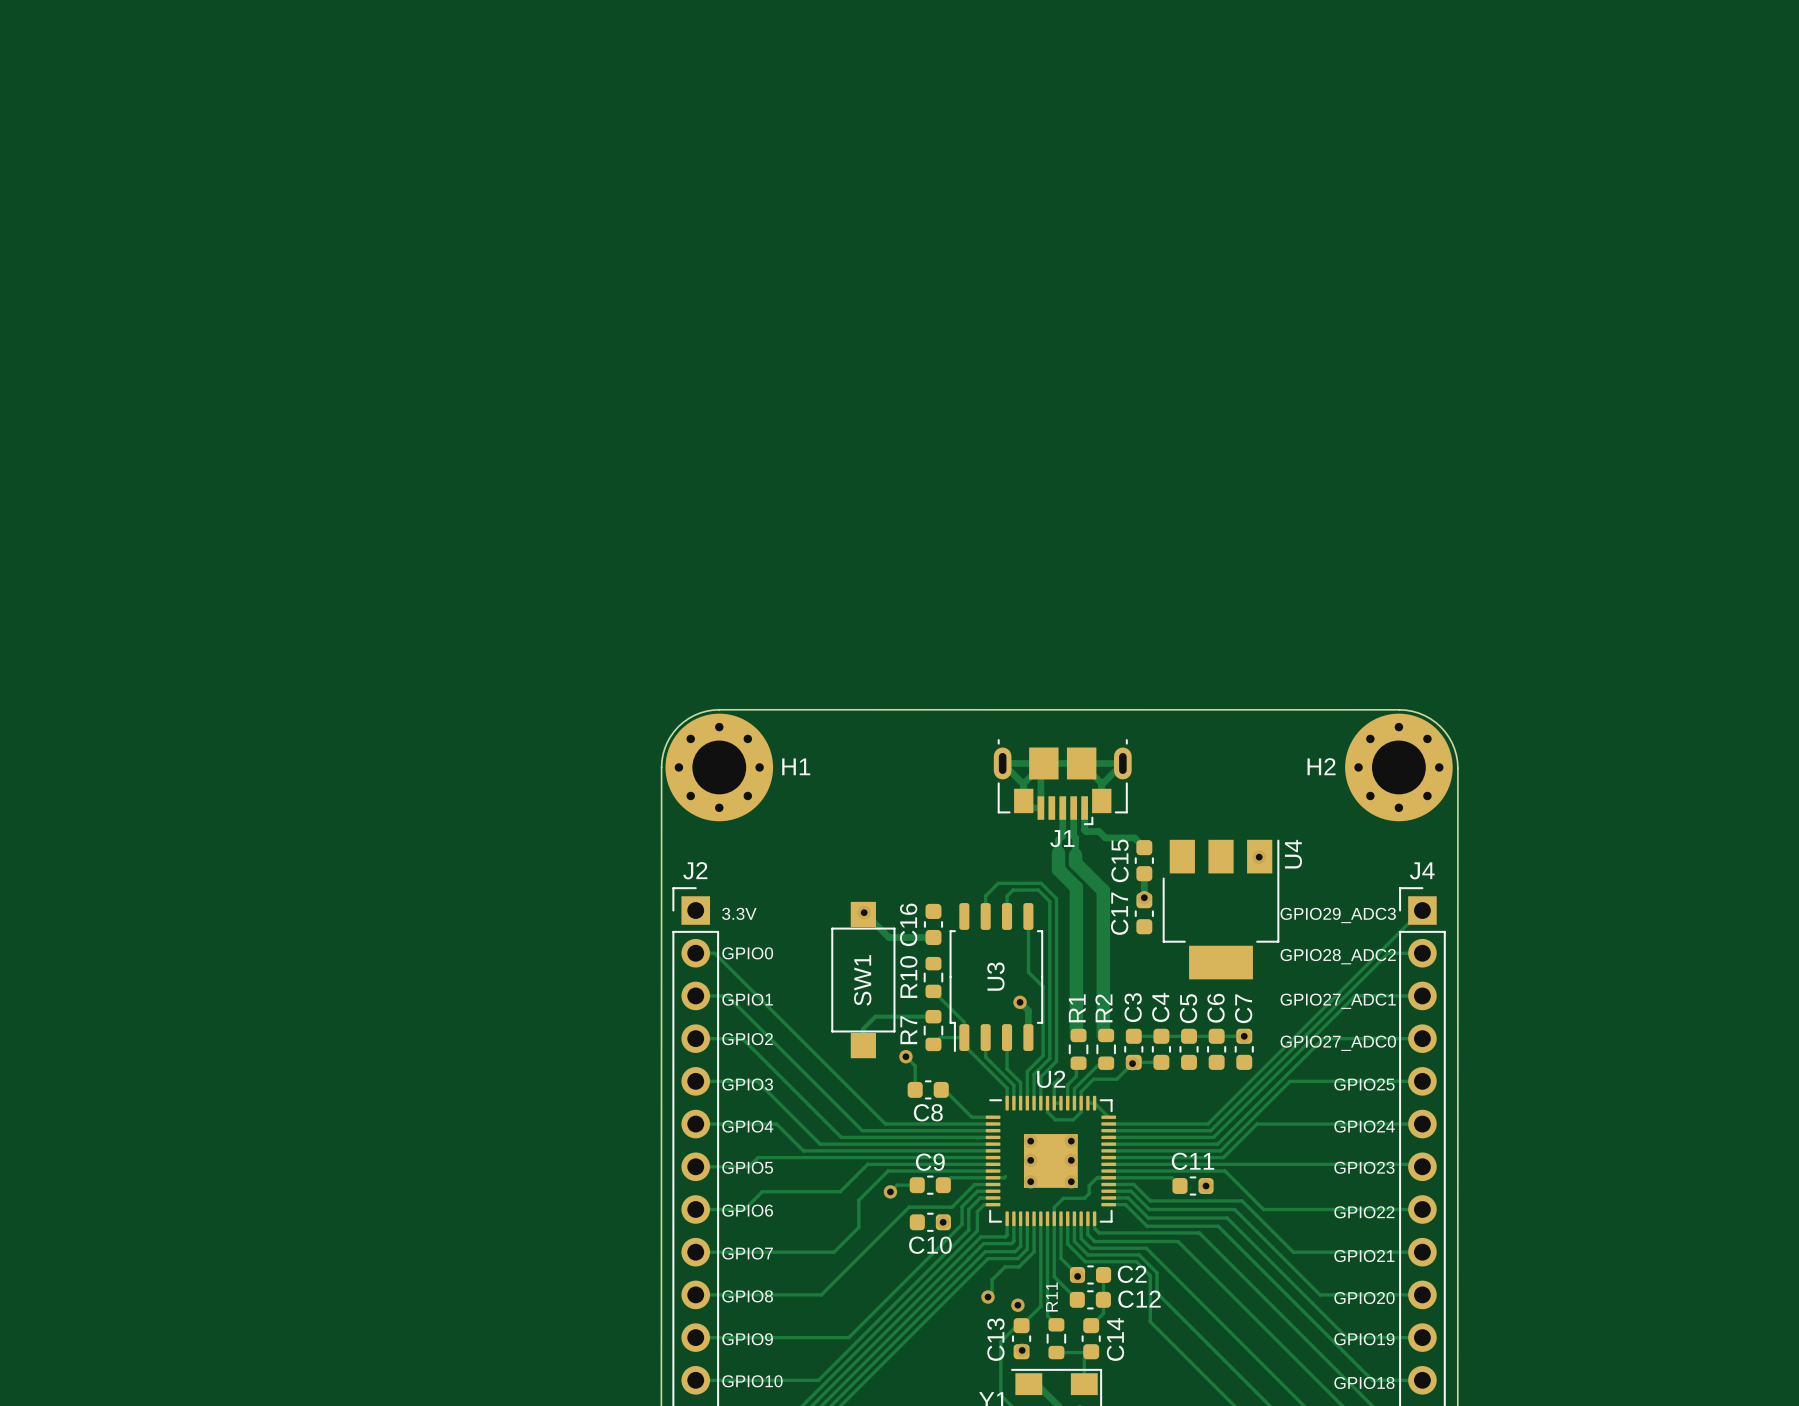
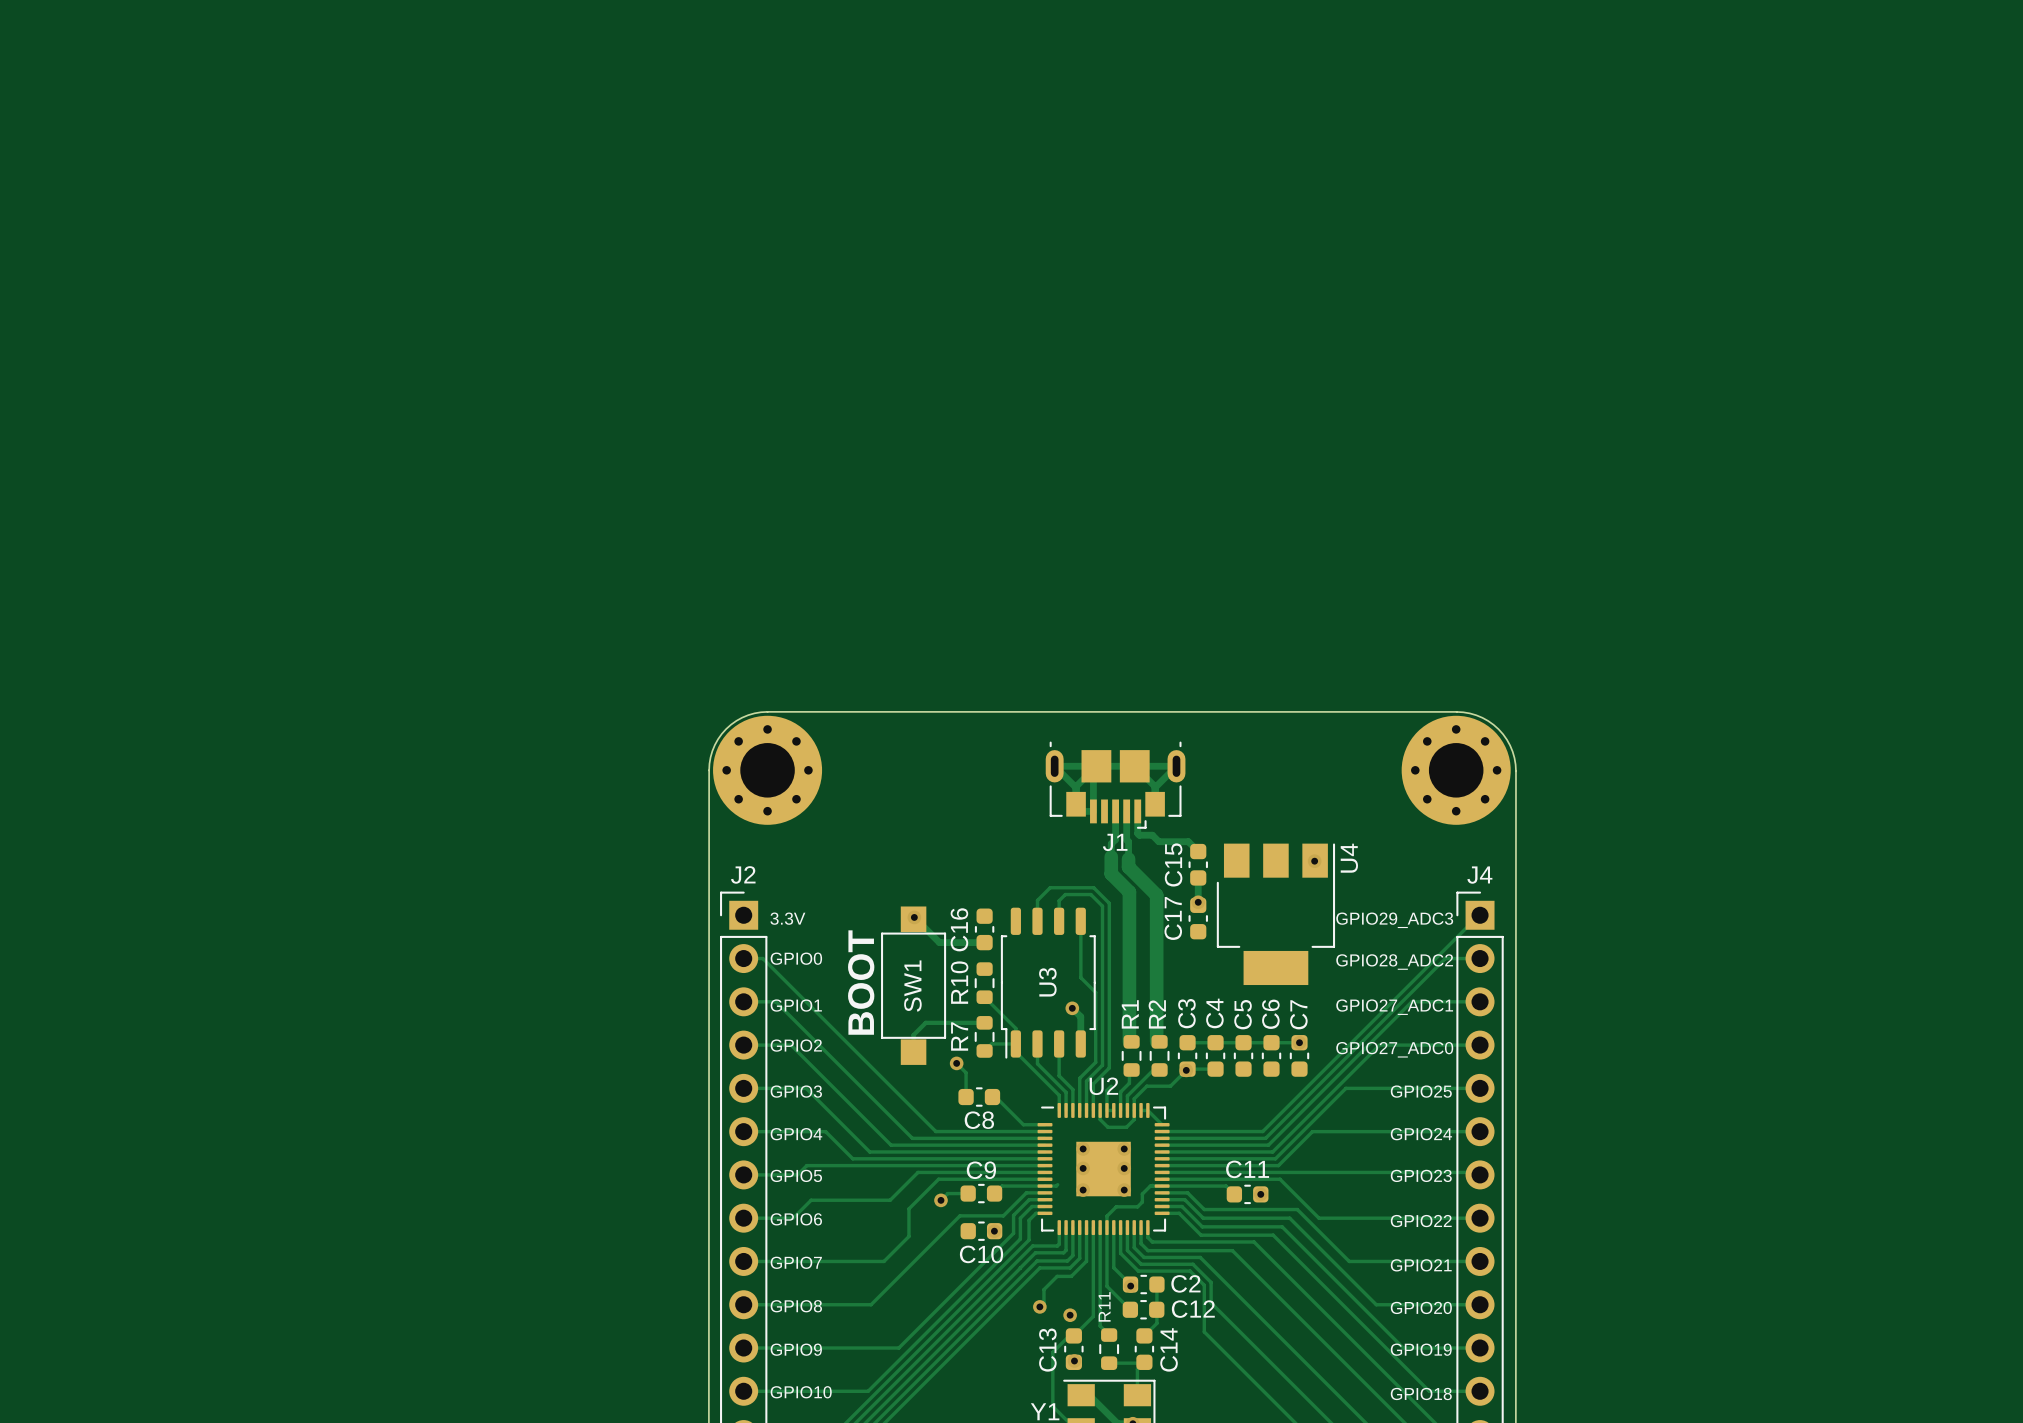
H1 name: H1 (796, 766) -> none
H2 name: H2 (1321, 766) -> none
text: none -> BOOT (861, 982)

